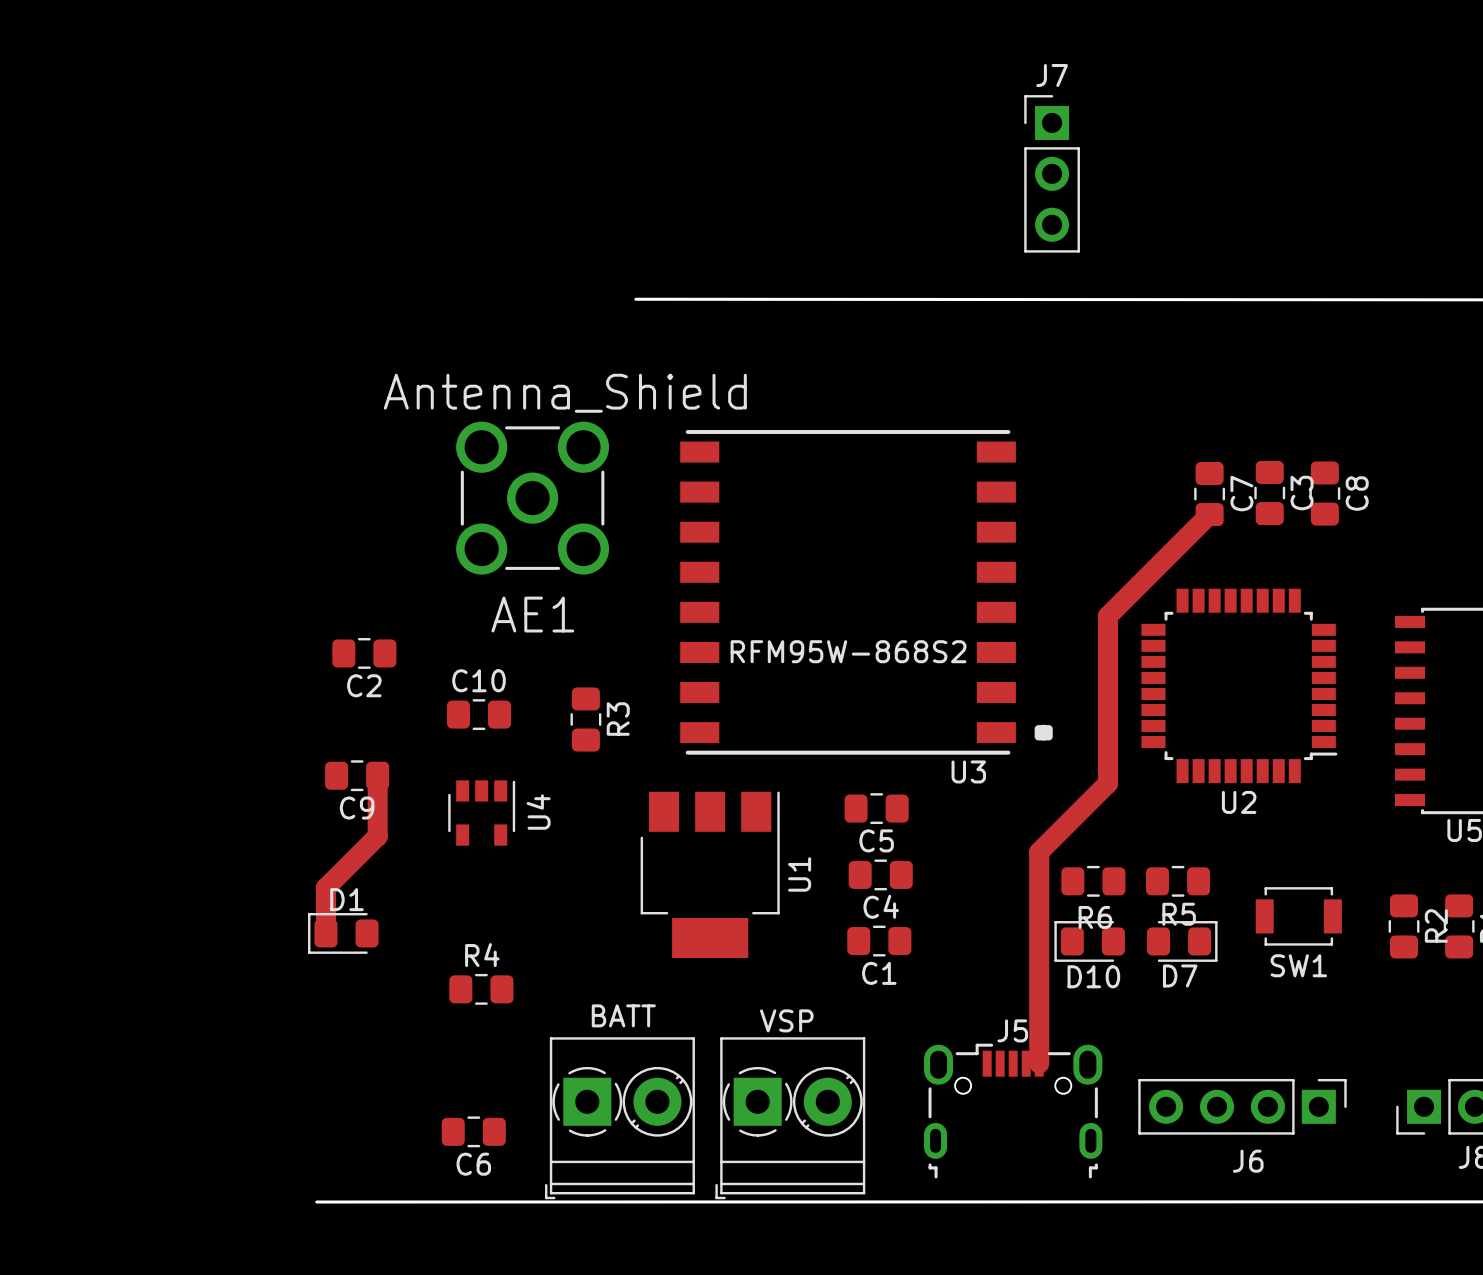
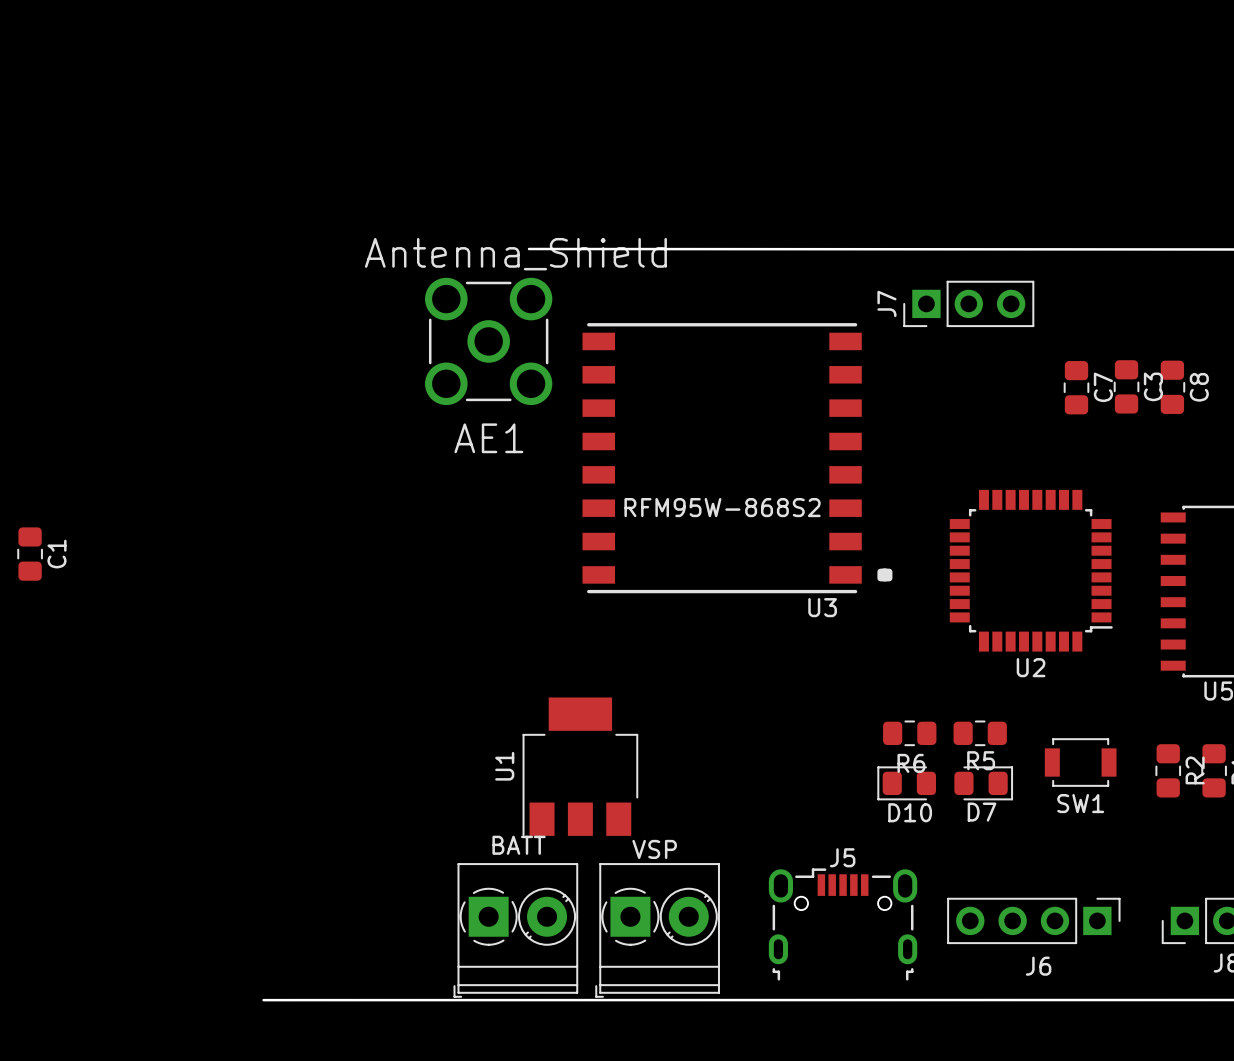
J7 rotation: 0° (1052, 173) -> 90° counterclockwise (968, 303)
J7 position: (1052, 173) -> (968, 303)
C3 position: (1269, 493) -> (1126, 386)
C8 position: (1324, 493) -> (1172, 387)
C7 position: (1209, 494) -> (1076, 387)
AE1 position: (532, 498) -> (488, 341)
track: (1209, 514) (1108, 616) (1108, 783) (1039, 852) (1039, 1063) -> none
U3 position: (866, 592) -> (737, 458)
C2: (364, 653) -> none
C10: (478, 714) -> none
R3: (585, 719) -> none
C9: (357, 775) -> none
track: (377, 775) (377, 836) (325, 887) (325, 933) -> none
C5: (876, 808) -> none
U4: (481, 812) -> none
U1 rotation: 0° (710, 874) -> 180° (580, 766)
C4: (880, 874) -> none
D1: (343, 933) -> none
C1 rotation: 0° (879, 941) -> 90° clockwise (30, 554)
C1 position: (879, 941) -> (30, 554)
C1 name position: C1 (879, 973) -> C1 (56, 554)
R4: (481, 989) -> none
C6: (473, 1131) -> none

